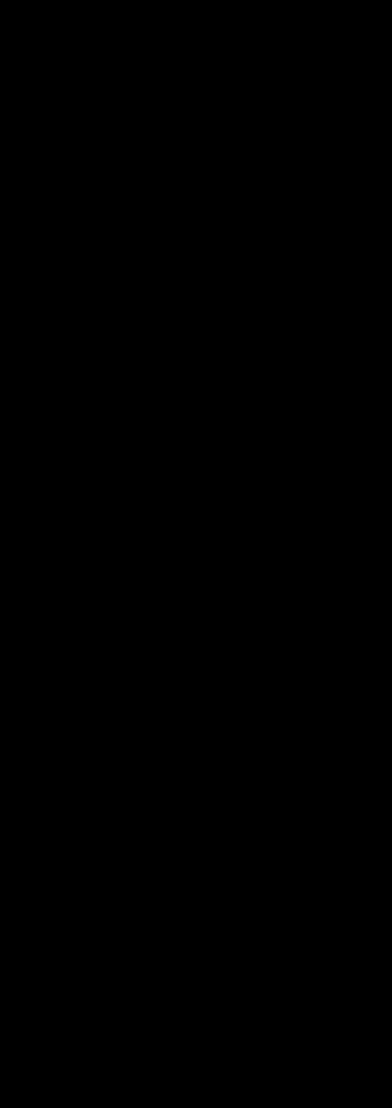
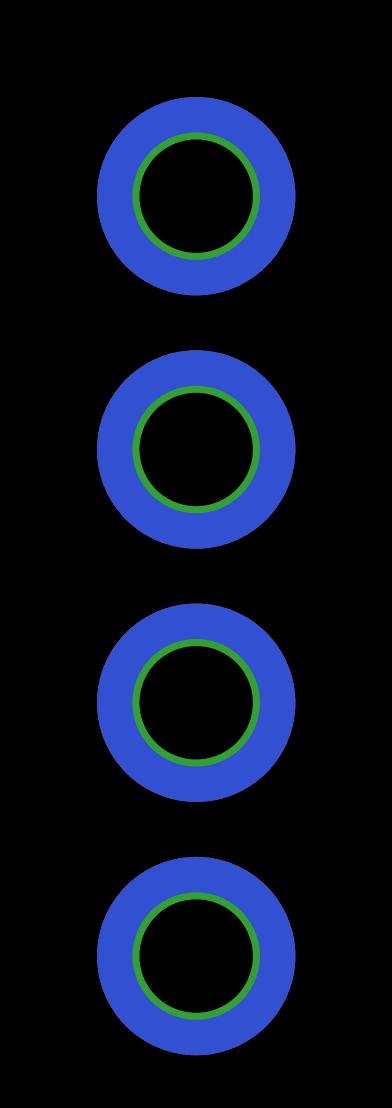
part: none -> (196, 196)
part: none -> (196, 449)
part: none -> (196, 702)
part: none -> (196, 956)

